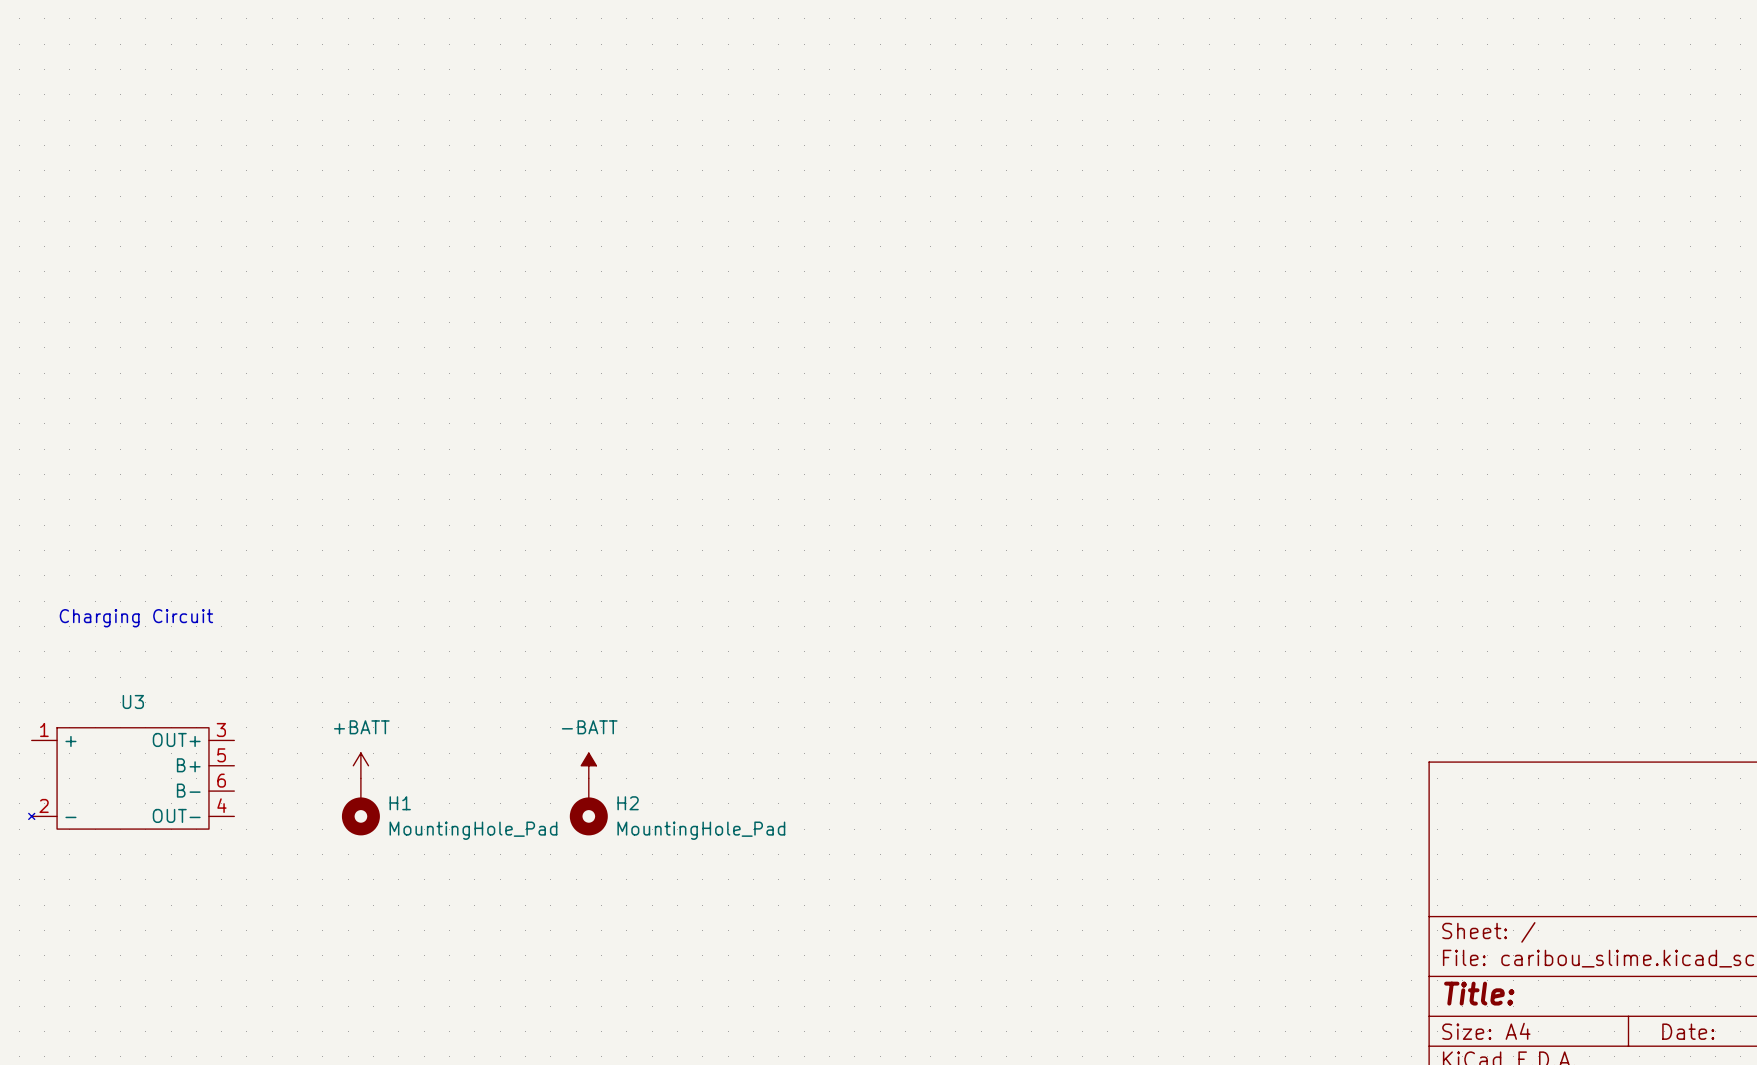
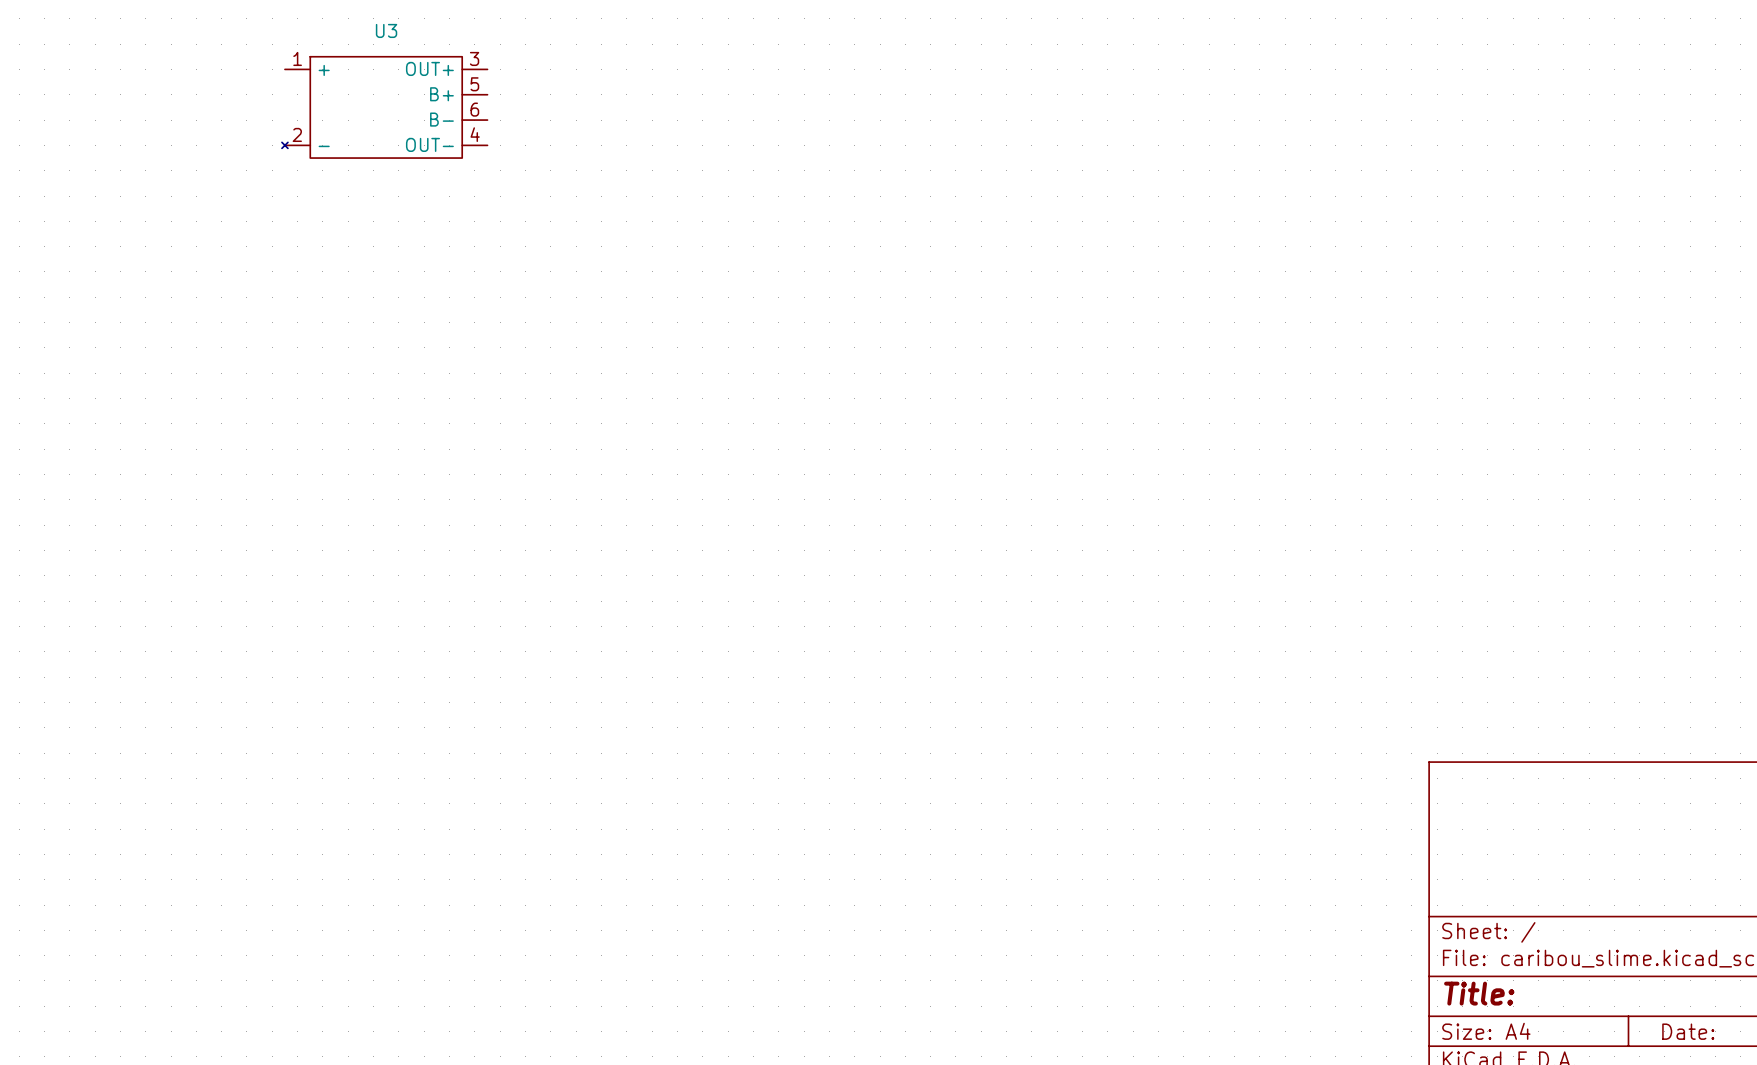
text: Charging Circuit (136, 618) -> none
power symbol: +BATT (360, 765) -> none
power symbol: -BATT (588, 765) -> none
U3 position: (131, 778) -> (384, 107)
H1: MountingHole_Pad (360, 806) -> none
H2: MountingHole_Pad (588, 806) -> none

